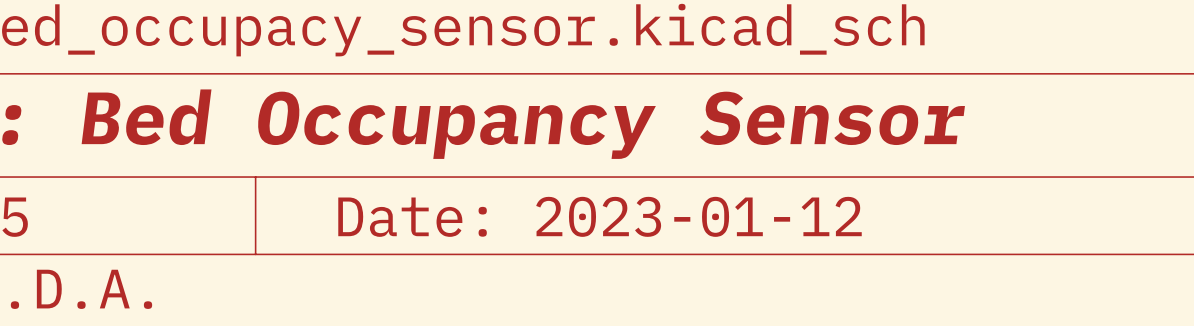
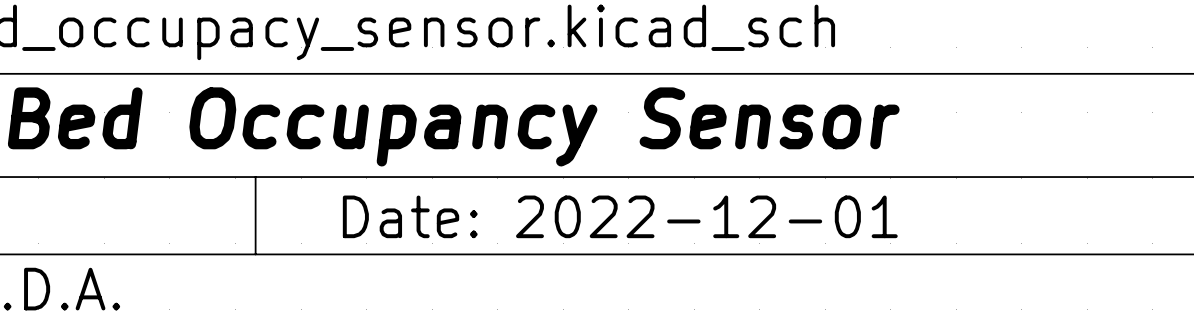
title block: Date: 2023-01-12 (600, 216) -> Date: 2022-12-01 (620, 216)

